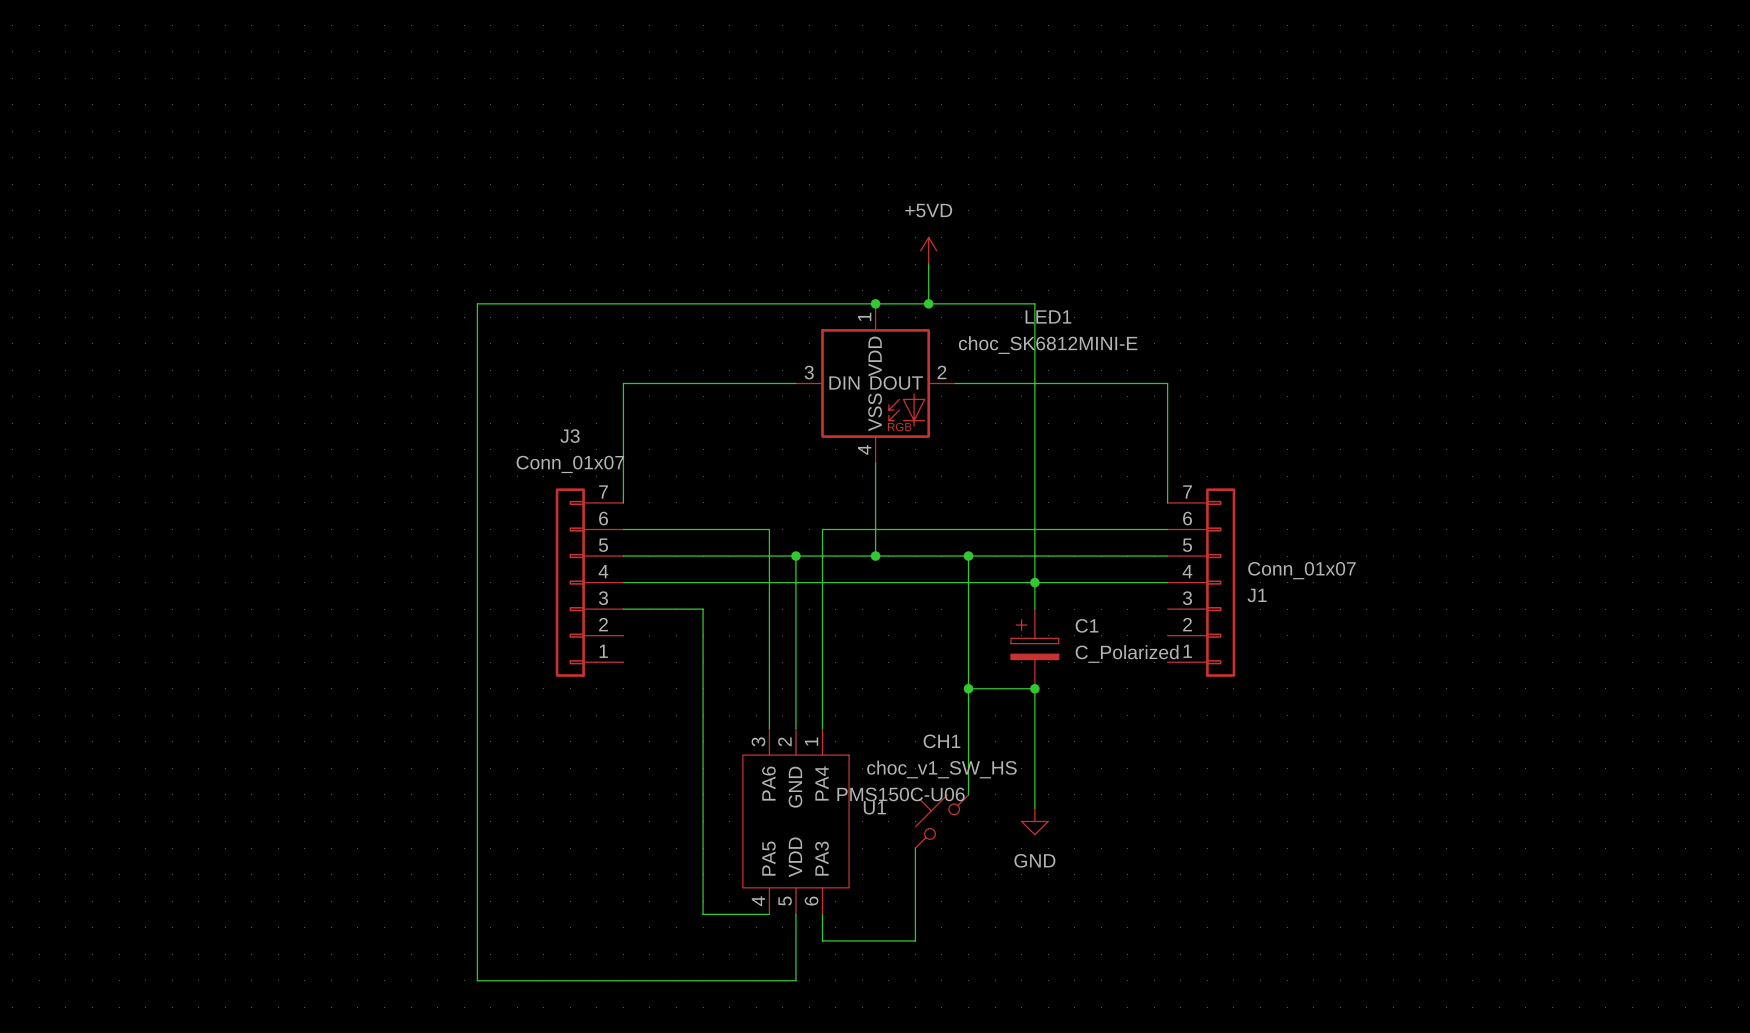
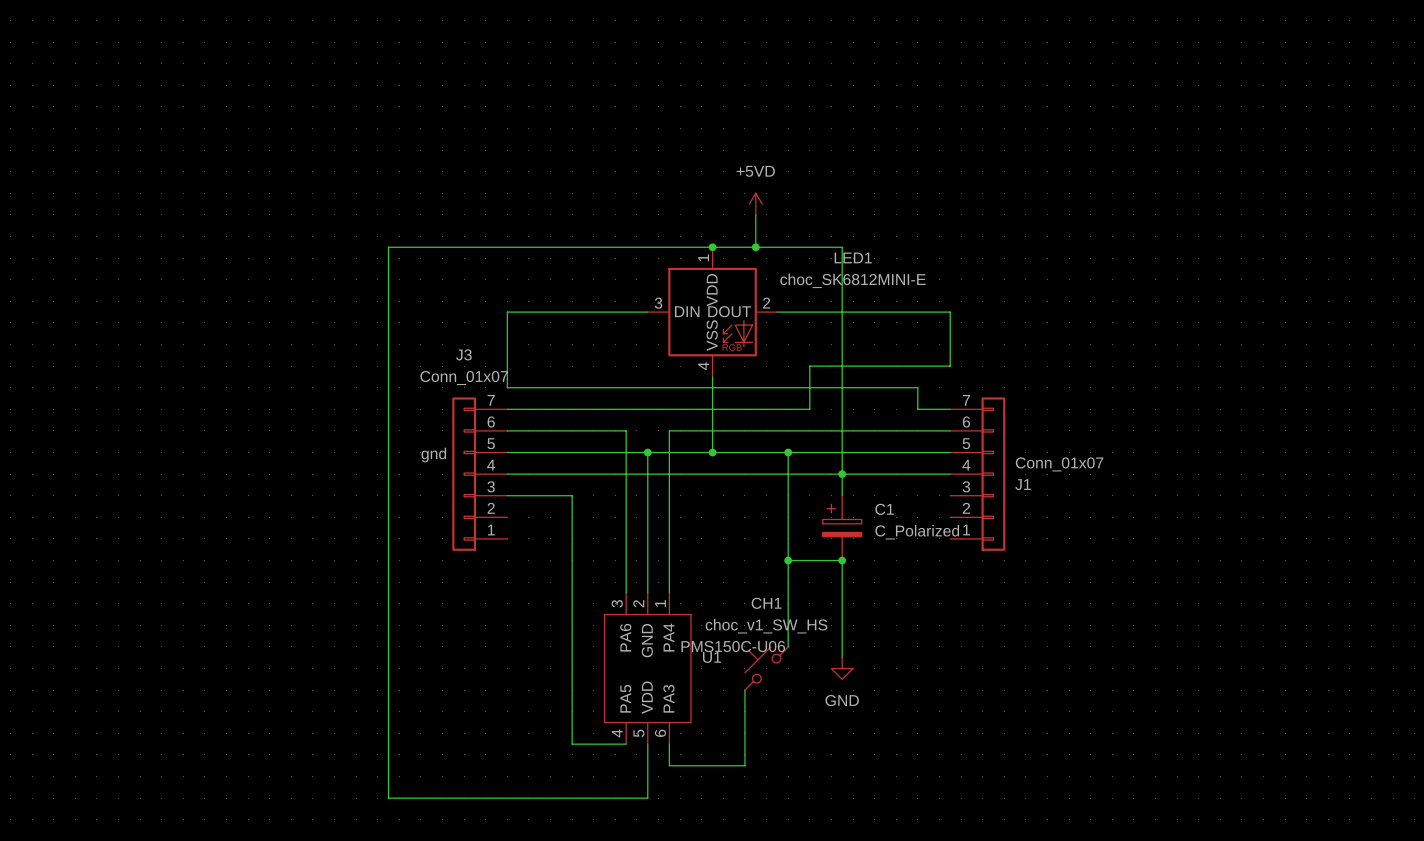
wire: (1167, 449) (1167, 502) -> (950, 366) (809, 366) (809, 409) (507, 409)
wire: (623, 476) (623, 502) -> (507, 387) (917, 387) (917, 409) (950, 409)
label: none -> gnd (433, 455)

